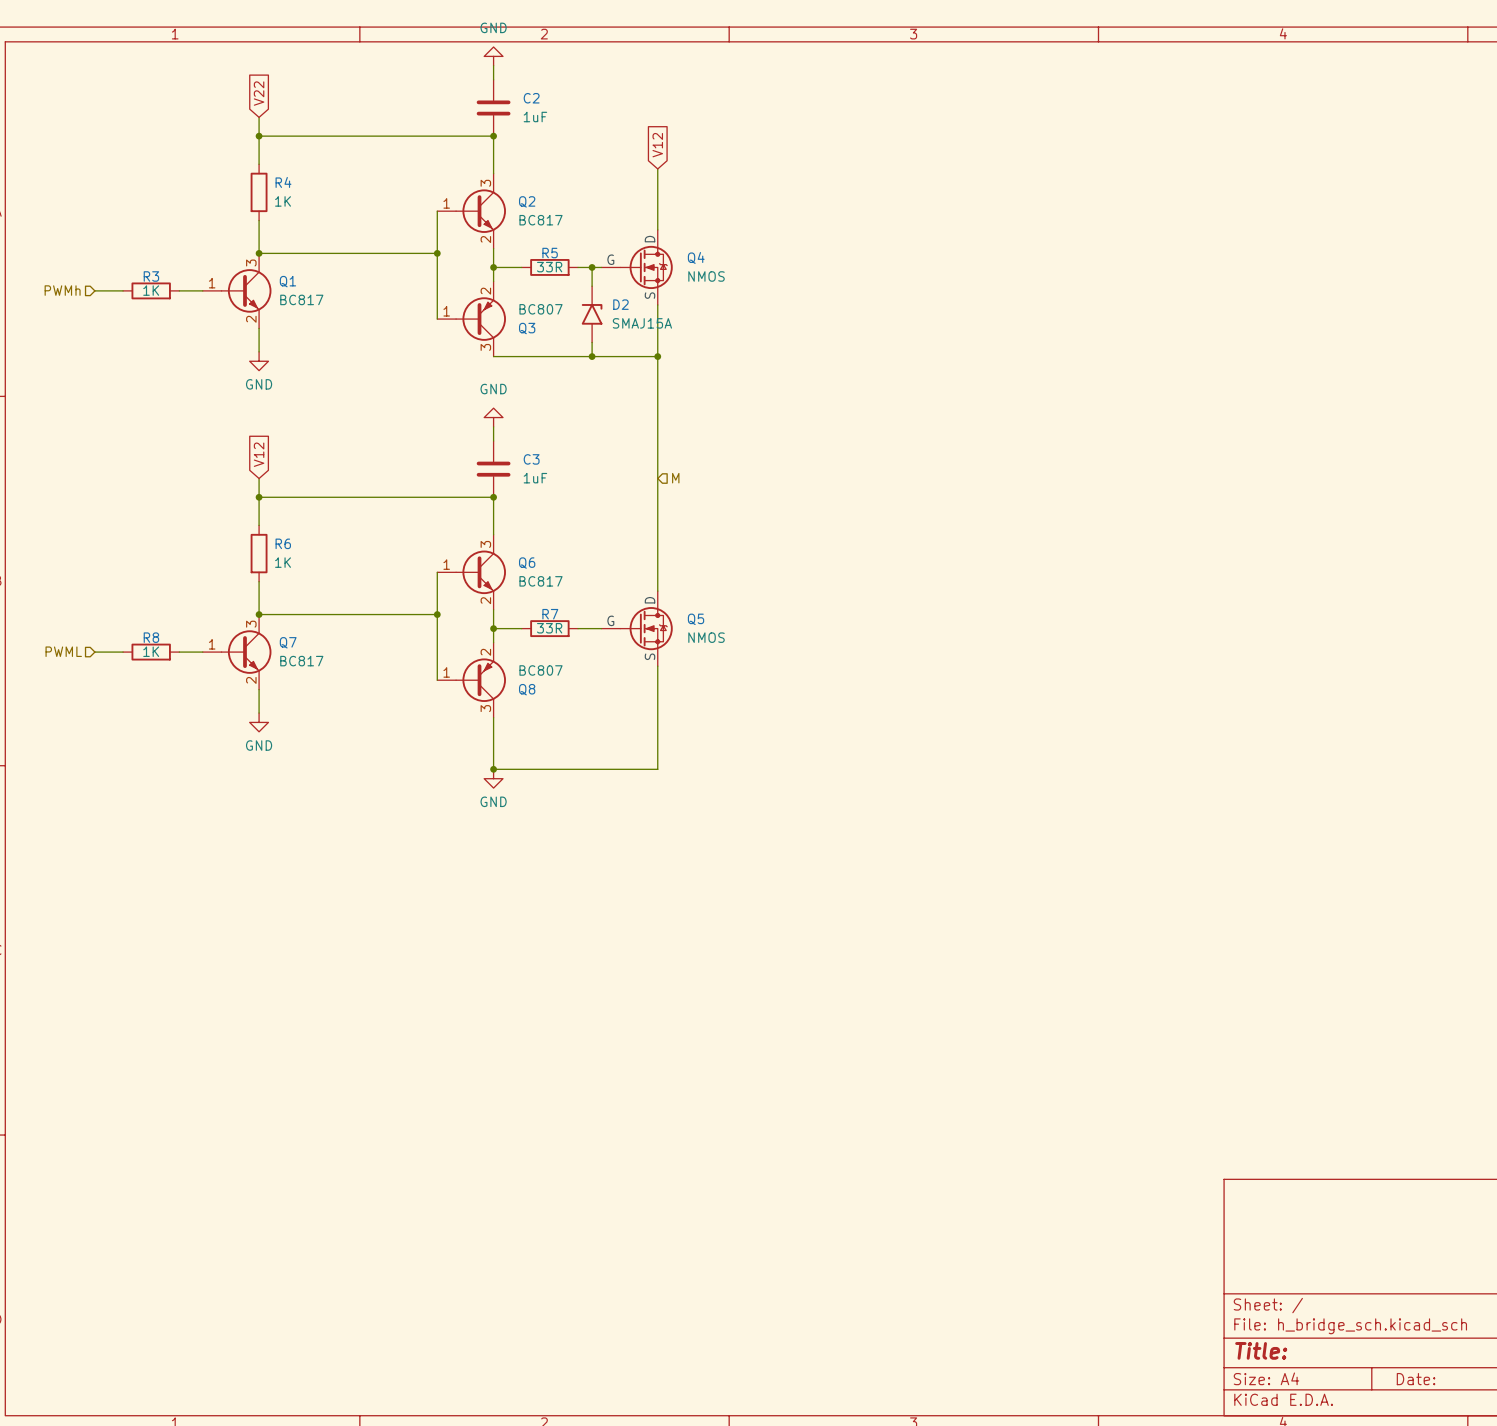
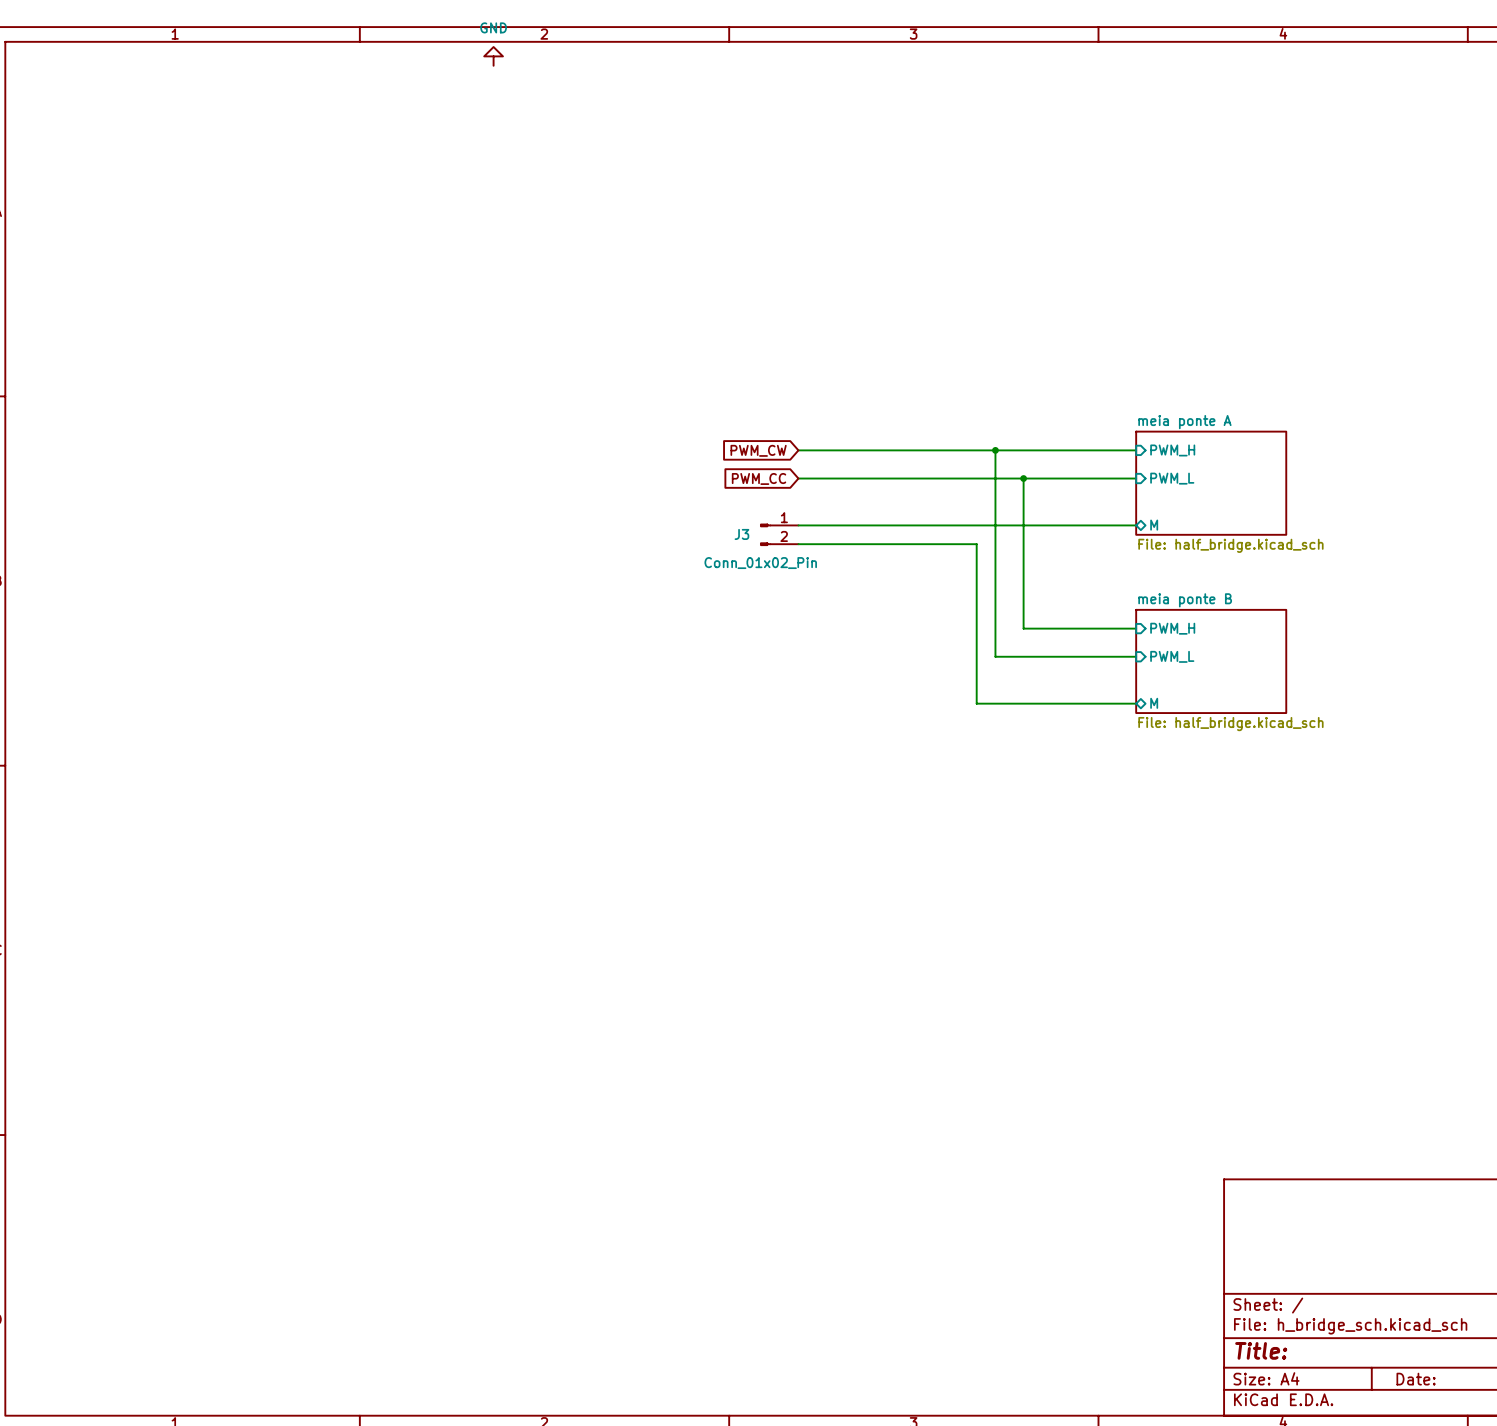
wire: (493, 65) (493, 79) -> none
global label: V22 (259, 93) -> none
C2: 1uF (493, 107) -> none
wire: (259, 117) (259, 164) -> none
wire: (259, 136) (493, 136) (493, 173) -> none
junction: (259, 136) -> none
junction: (493, 136) -> none
global label: V12 (657, 145) -> none
wire: (657, 168) (657, 229) -> none
R4: 1K (259, 192) -> none
wire: (437, 211) (437, 319) -> none
Q2: BC817 (471, 211) -> none
wire: (259, 220) (259, 253) (437, 253) -> none
wire: (493, 248) (493, 281) -> none
junction: (259, 253) -> none
junction: (437, 253) -> none
wire: (493, 267) (521, 267) -> none
junction: (493, 267) -> none
R5: 33R (549, 267) -> none
wire: (578, 267) (601, 267) -> none
wire: (592, 267) (592, 286) -> none
junction: (592, 267) -> none
Q4: NMOS (637, 267) -> none
hierarchical label: PWMh (62, 290) -> none
wire: (94, 290) (123, 290) -> none
R3: 1K (151, 290) -> none
wire: (179, 290) (202, 290) -> none
Q1: BC817 (237, 290) -> none
wire: (657, 304) (657, 591) -> none
D2: SMAJ15A (592, 314) -> none
Q3: BC807 (471, 319) -> none
wire: (259, 328) (259, 351) -> none
wire: (592, 342) (592, 356) -> none
wire: (493, 356) (657, 356) -> none
junction: (592, 356) -> none
junction: (657, 356) -> none
power symbol: GND (259, 361) -> none
power symbol: GND (493, 417) -> none
wire: (493, 426) (493, 441) -> none
global label: none -> PWM_CW (758, 450)
wire: none -> (798, 450) (1136, 450)
wire: none -> (995, 450) (995, 656) (1136, 656)
junction: none -> (995, 450)
sheet pin: none -> PWM_H (1172, 450)
global label: V12 (259, 454) -> none
C3: 1uF (493, 469) -> none
wire: (259, 478) (259, 525) -> none
hierarchical label: M (675, 478) -> none
global label: none -> PWM_CC (759, 478)
wire: none -> (798, 478) (1136, 478)
wire: none -> (1023, 478) (1023, 628) (1136, 628)
junction: none -> (1023, 478)
sheet pin: none -> PWM_L (1172, 478)
sheet meia ponte A: none -> File: half_bridge.kicad_sch (1211, 483)
wire: (259, 497) (493, 497) (493, 534) -> none
junction: (259, 497) -> none
junction: (493, 497) -> none
wire: none -> (798, 525) (1136, 525)
sheet pin: none -> M (1154, 525)
J3: none -> Conn_01x02_Pin (779, 534)
wire: none -> (798, 544) (976, 544) (976, 703) (1136, 703)
R6: 1K (259, 553) -> none
wire: (437, 572) (437, 680) -> none
Q6: BC817 (471, 572) -> none
wire: (259, 581) (259, 614) (437, 614) -> none
wire: (493, 609) (493, 642) -> none
junction: (259, 614) -> none
junction: (437, 614) -> none
wire: (493, 628) (521, 628) -> none
junction: (493, 628) -> none
R7: 33R (549, 628) -> none
wire: (578, 628) (601, 628) -> none
Q5: NMOS (637, 628) -> none
sheet pin: none -> PWM_H (1172, 628)
hierarchical label: PWML (63, 651) -> none
wire: (94, 652) (123, 652) -> none
R8: 1K (151, 652) -> none
wire: (179, 652) (202, 652) -> none
Q7: BC817 (237, 652) -> none
sheet pin: none -> PWM_L (1172, 656)
sheet meia ponte B: none -> File: half_bridge.kicad_sch (1211, 661)
wire: (657, 666) (657, 769) (493, 769) (493, 717) -> none
Q8: BC807 (471, 680) -> none
wire: (259, 689) (259, 713) -> none
sheet pin: none -> M (1154, 703)
power symbol: GND (259, 722) -> none
junction: (493, 769) -> none
power symbol: GND (493, 778) -> none

